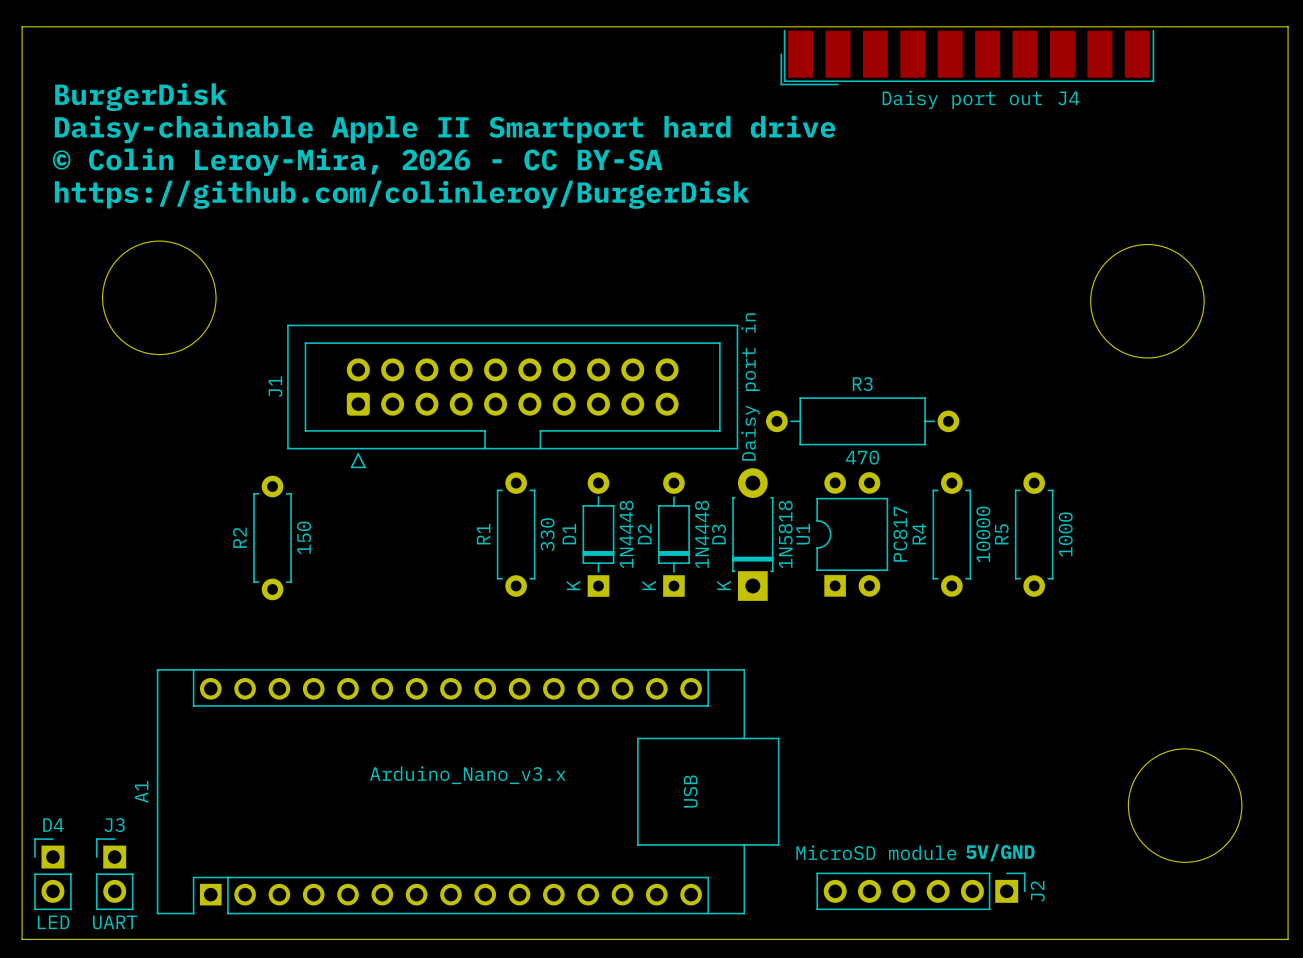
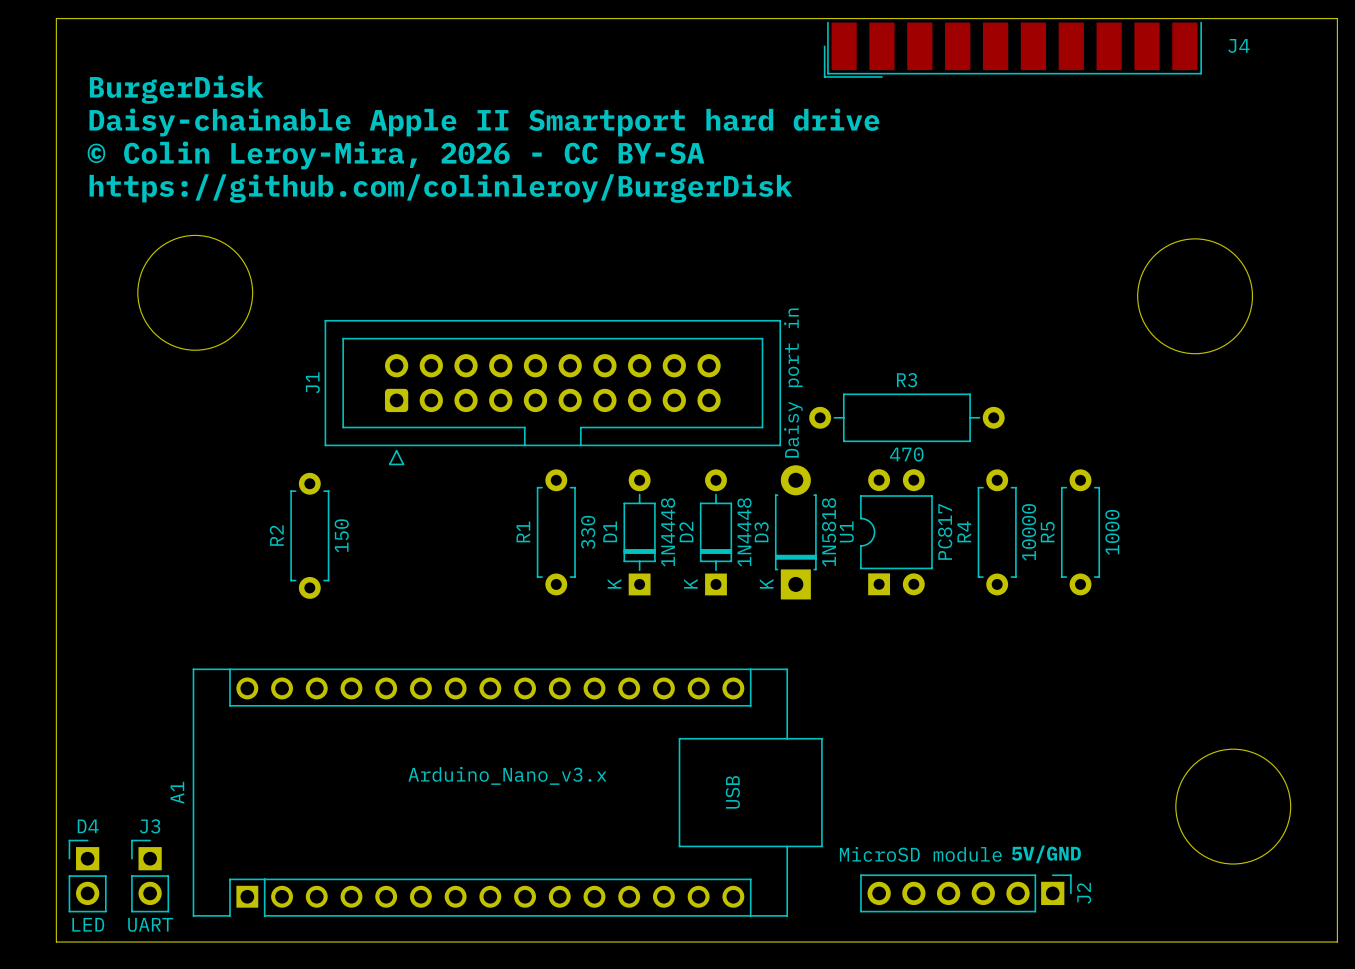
J4 name position: J4 (1068, 98) -> J4 (1238, 45)
J4 text: Daisy port out (962, 99) -> none

